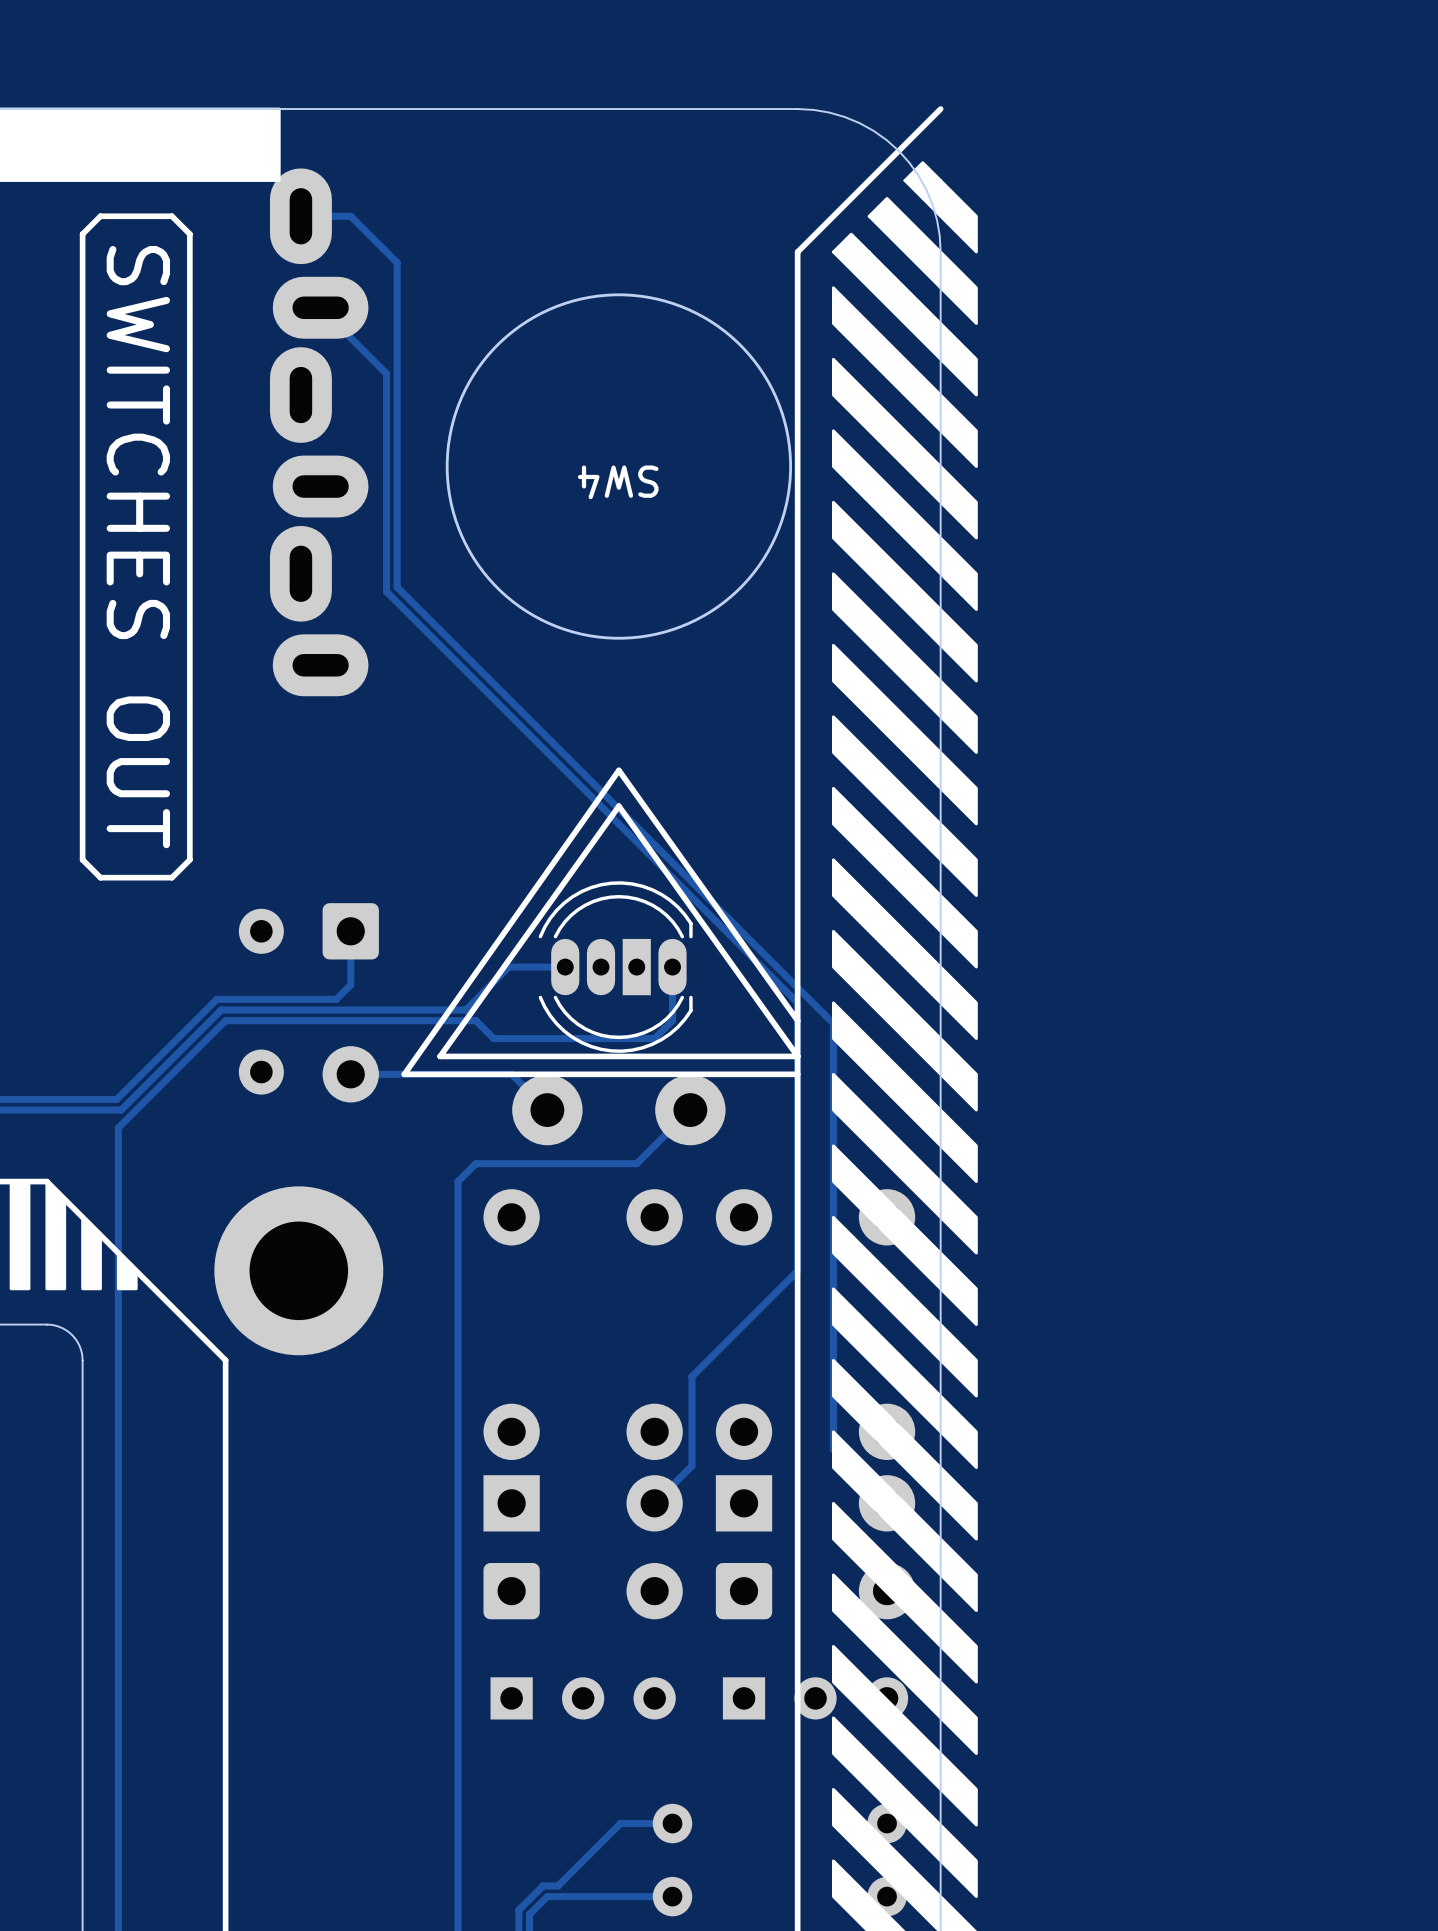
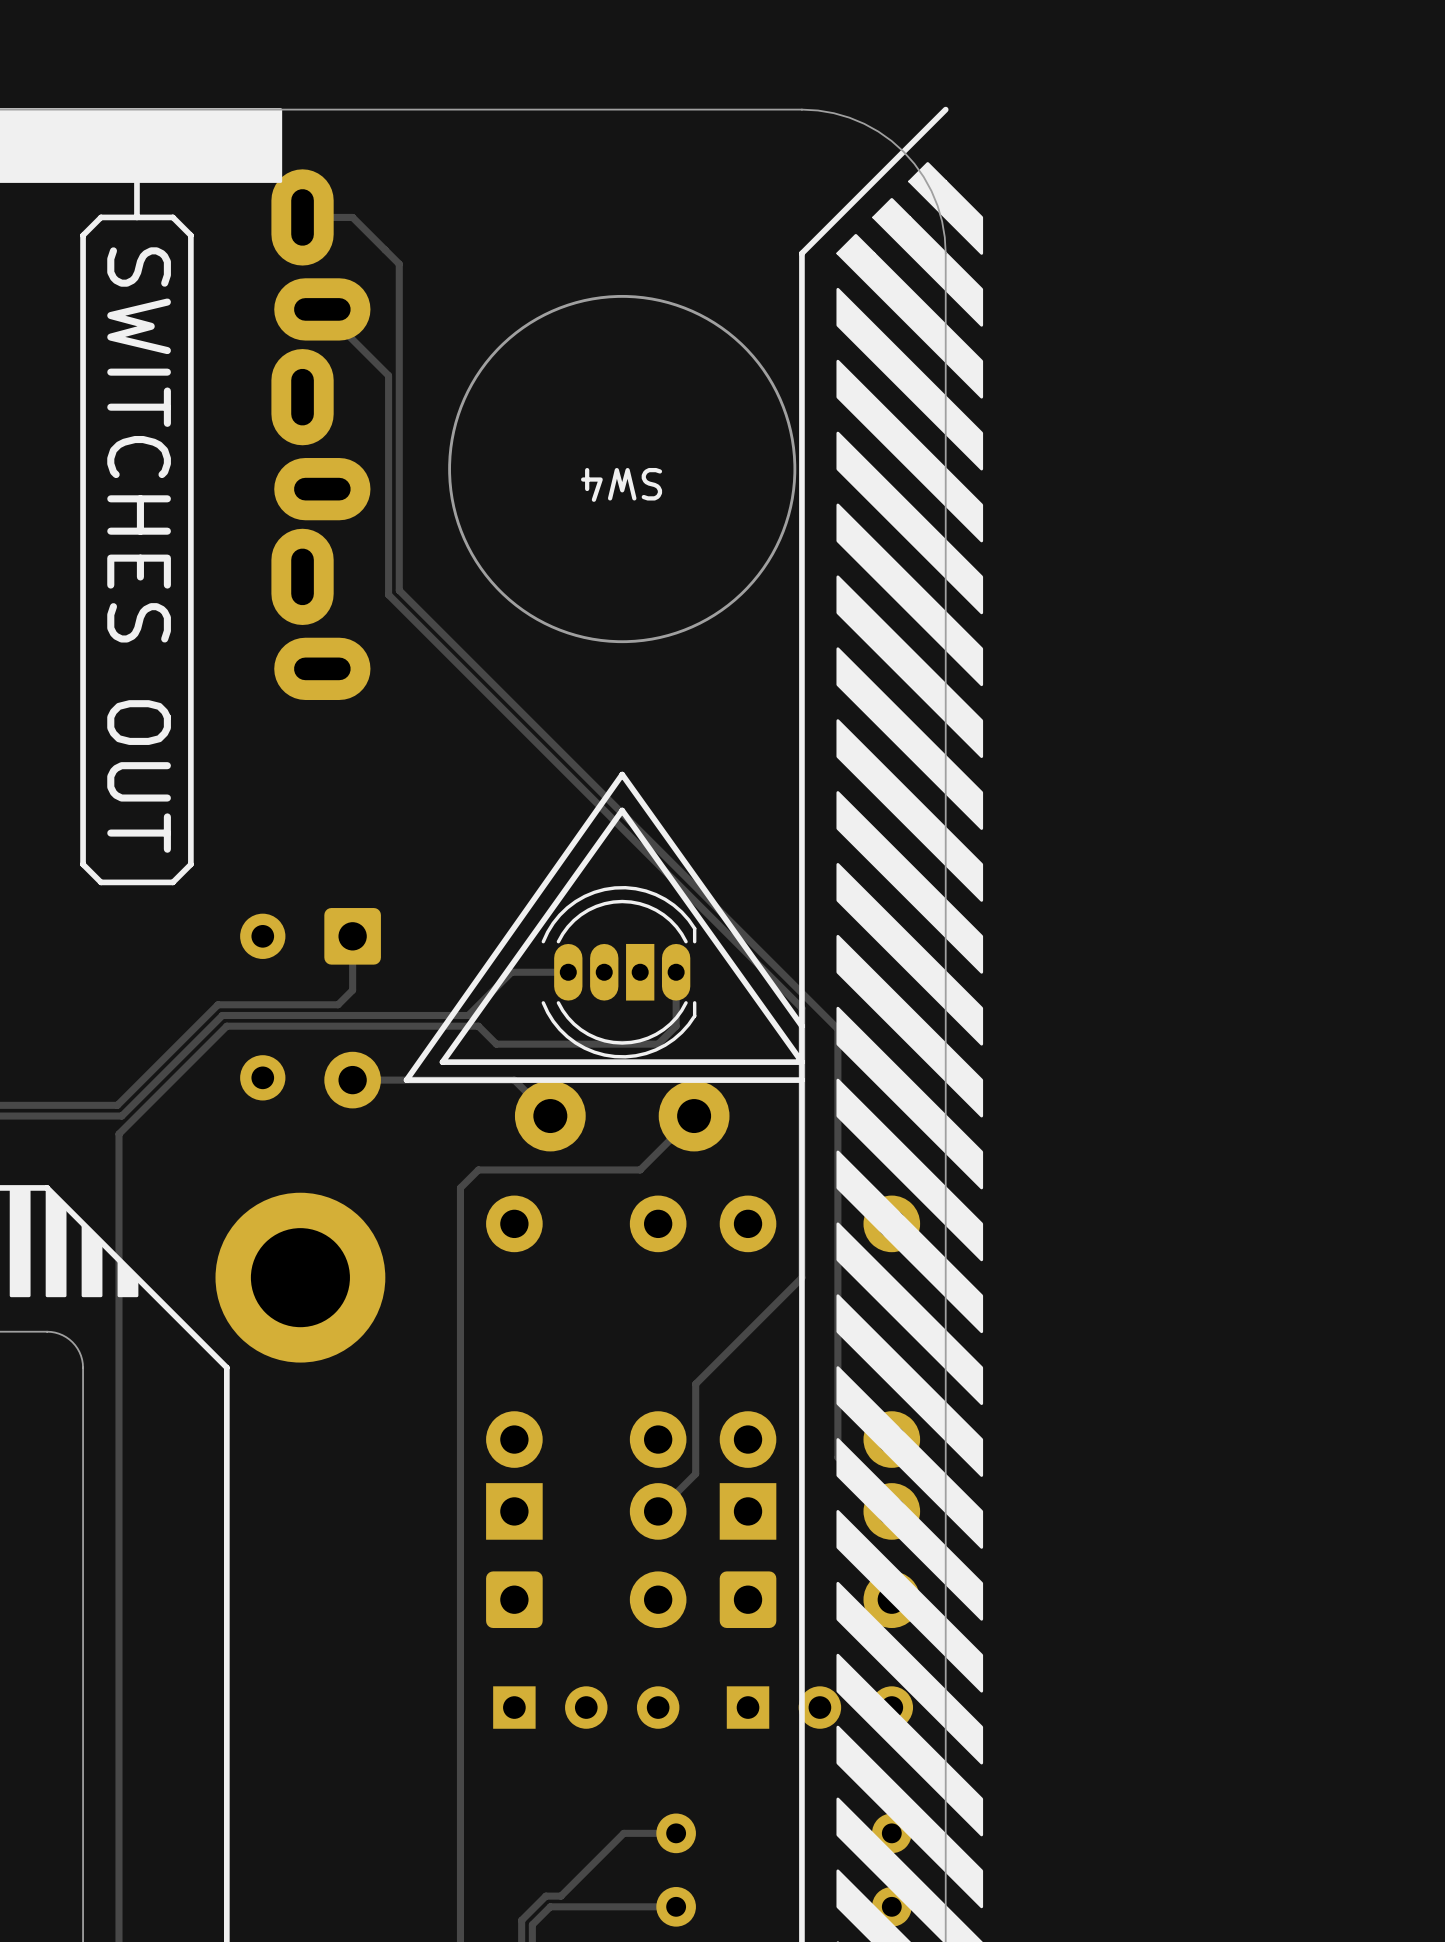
line: none -> (136, 181) (136, 217)

